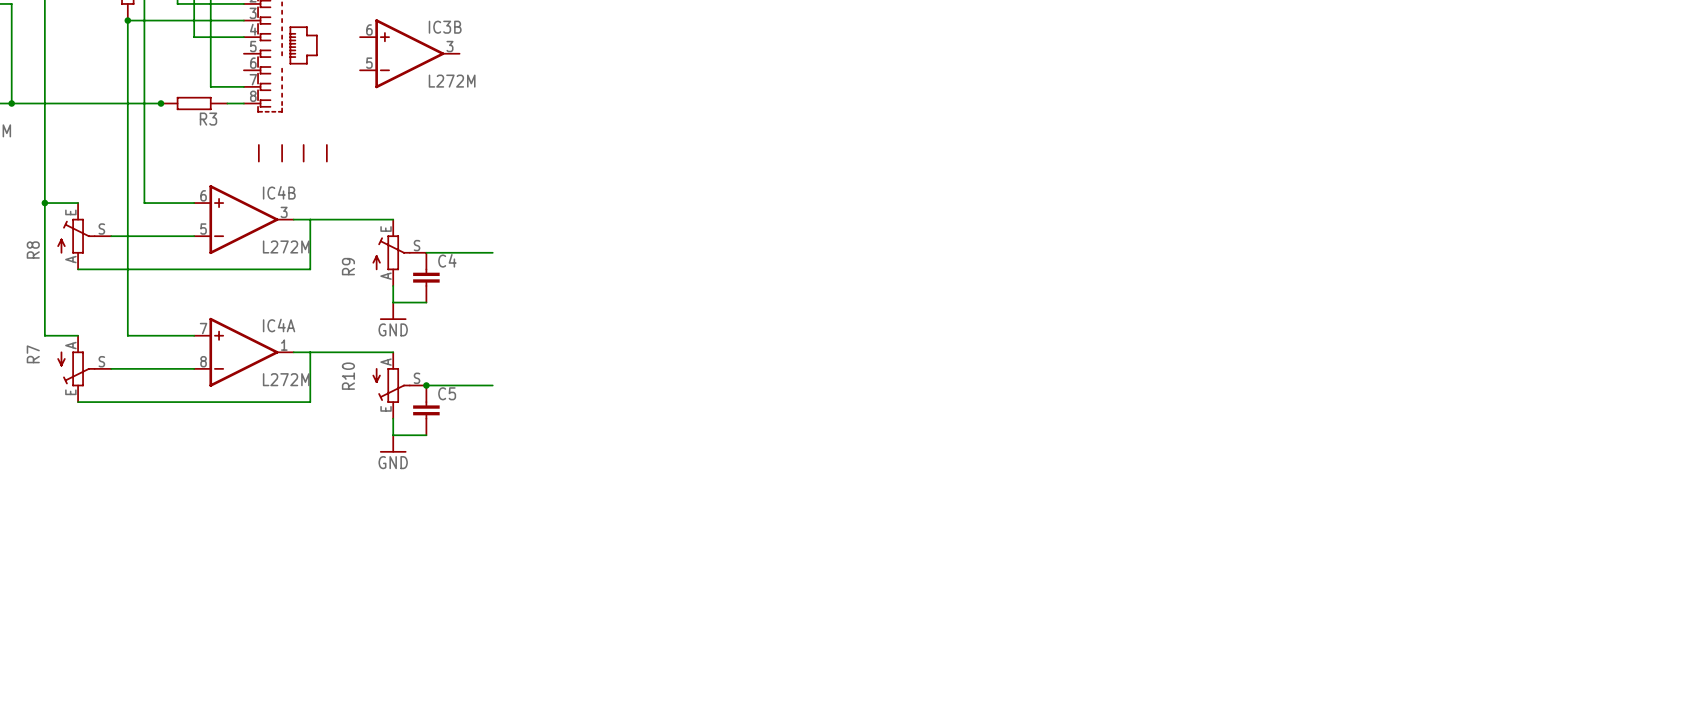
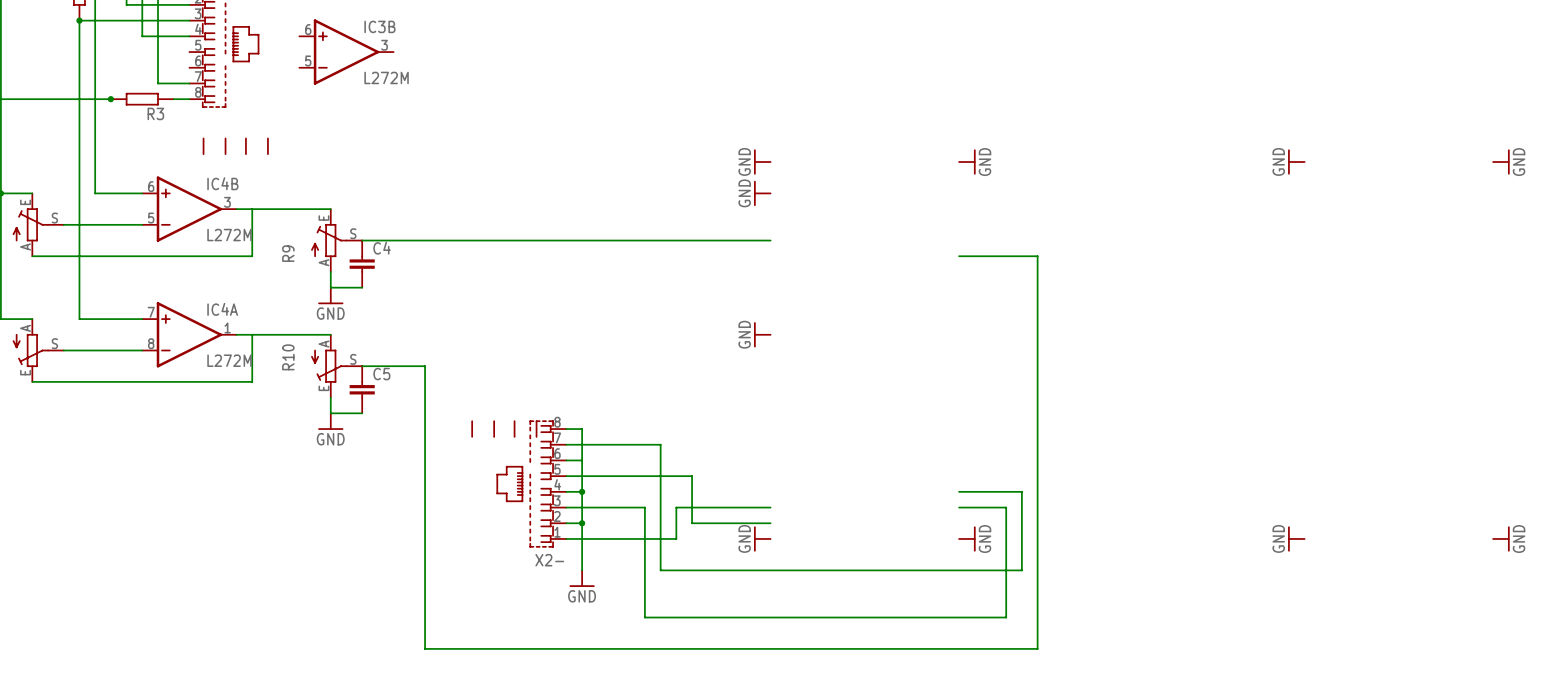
power symbol: none -> GND (762, 162)
power symbol: none -> GND (967, 162)
power symbol: none -> GND (1296, 162)
power symbol: none -> GND (1501, 162)
power symbol: none -> GND (762, 193)
wire: none -> (425, 240) (770, 240)
wire: none -> (959, 256) (1037, 256) (1037, 648) (425, 648) (425, 366)
power symbol: none -> GND (762, 334)
junction: (426, 385) -> none
part: none -> (472, 429)
part: none -> (494, 429)
part: none -> (514, 429)
part: none -> (536, 429)
wire: none -> (566, 429) (582, 429) (582, 570)
wire: none -> (566, 444) (660, 444) (660, 570) (1021, 570) (1021, 491) (959, 491)
wire: none -> (566, 460) (582, 460)
wire: none -> (566, 476) (692, 476) (692, 523) (770, 523)
X2-: none -> (531, 484)
wire: none -> (566, 491) (582, 491)
junction: none -> (582, 491)
wire: none -> (566, 507) (644, 507) (644, 617) (1006, 617) (1006, 507) (959, 507)
wire: none -> (770, 507) (676, 507) (676, 538) (566, 538)
wire: none -> (566, 523) (582, 523)
junction: none -> (582, 523)
power symbol: none -> GND (762, 538)
power symbol: none -> GND (967, 538)
power symbol: none -> GND (1296, 538)
power symbol: none -> GND (1501, 538)
power symbol: none -> GND (582, 578)

